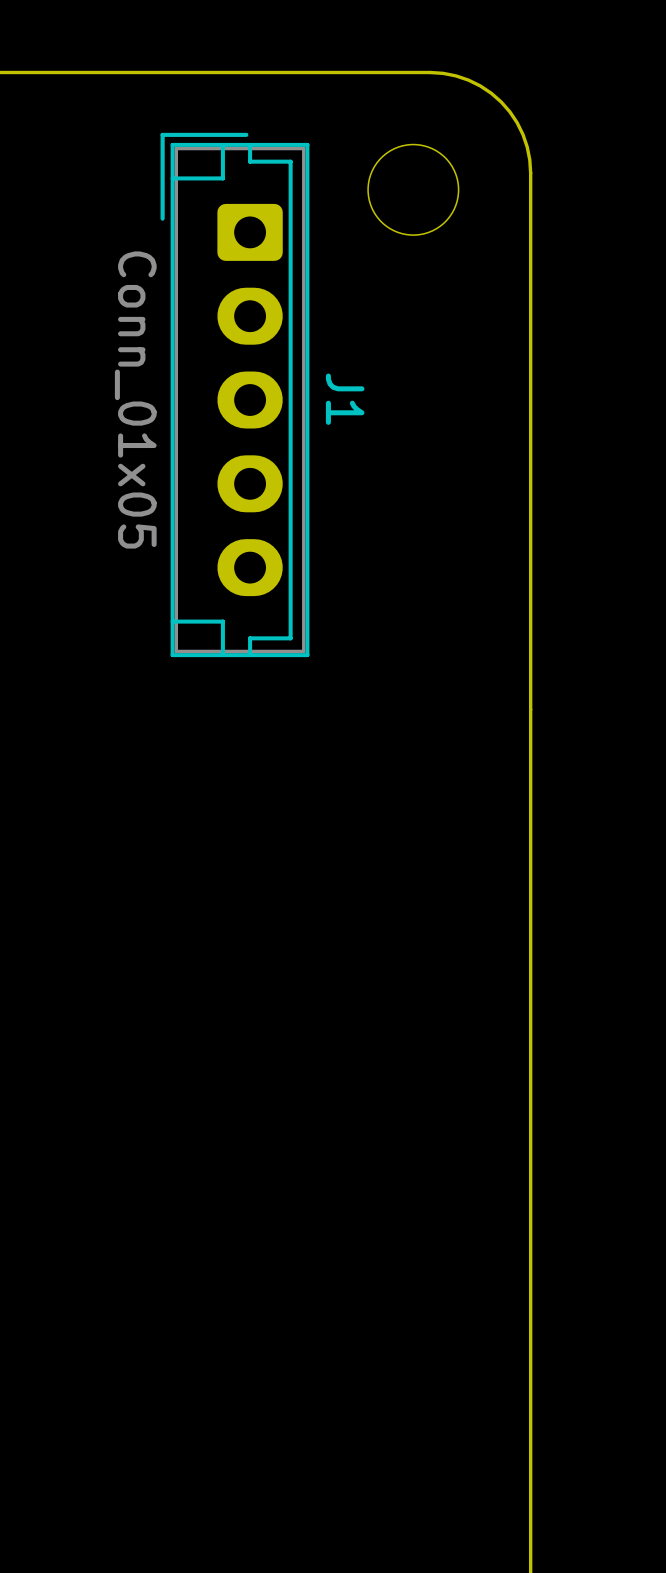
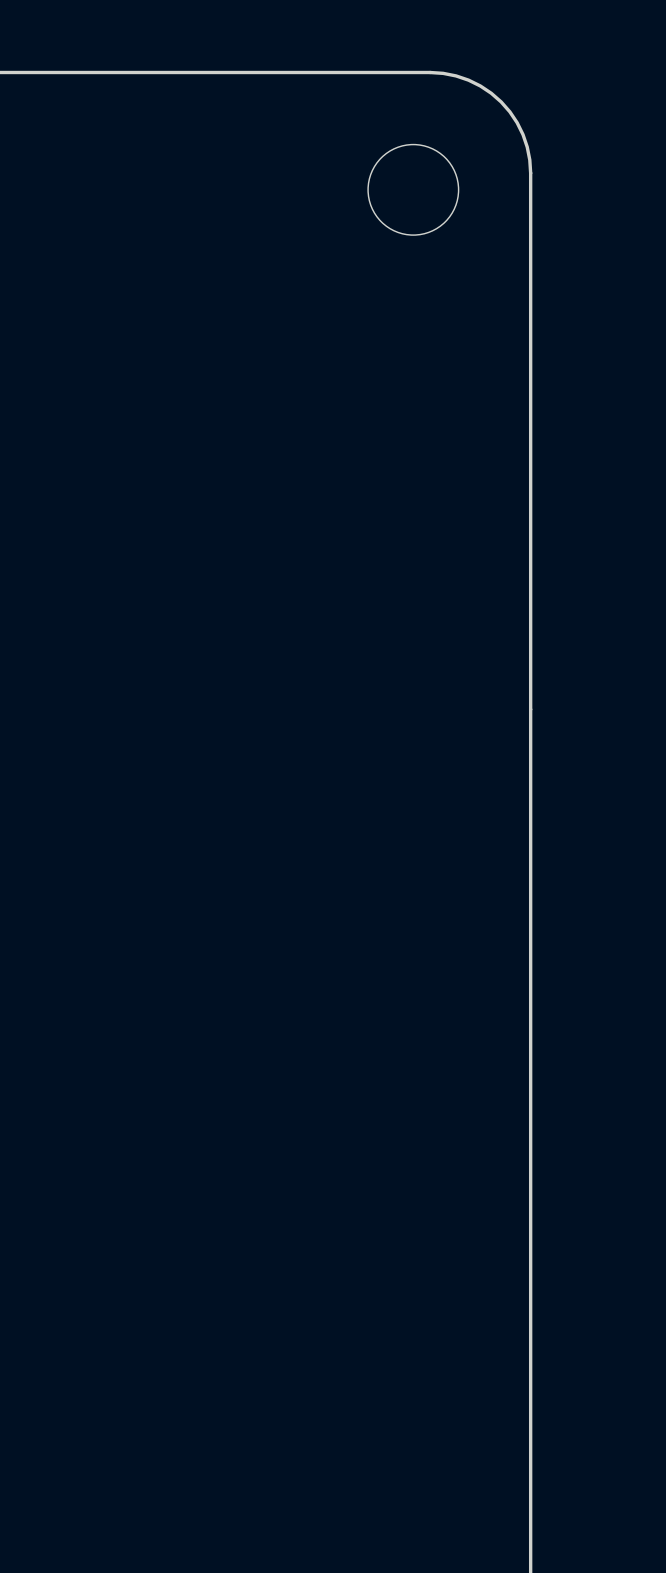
J1: Conn_01x05 (234, 394) -> none

